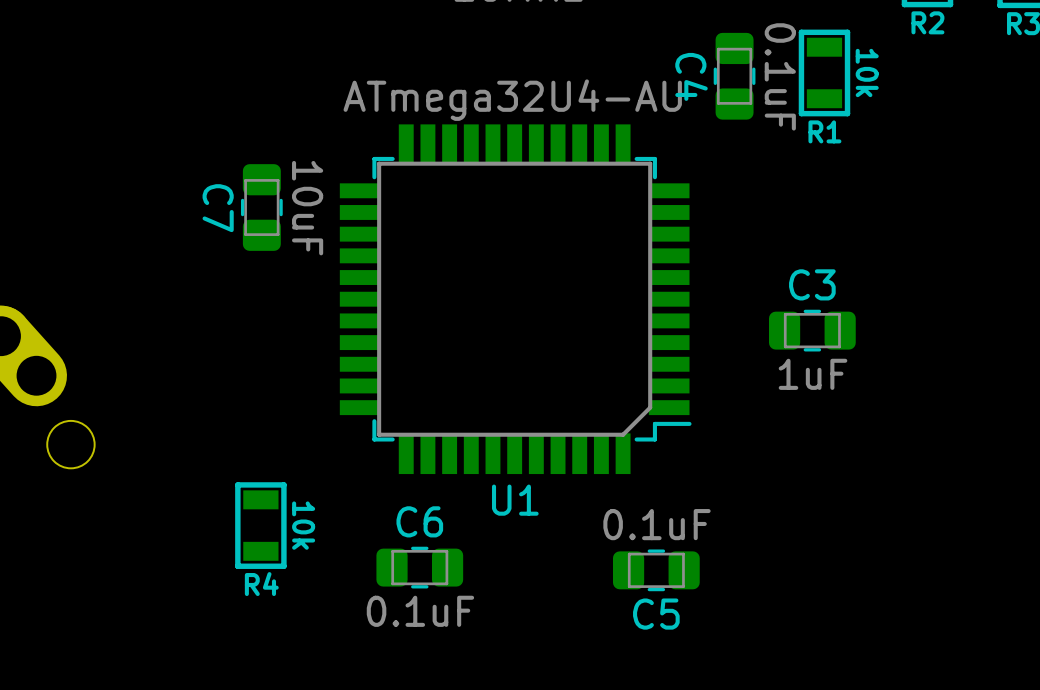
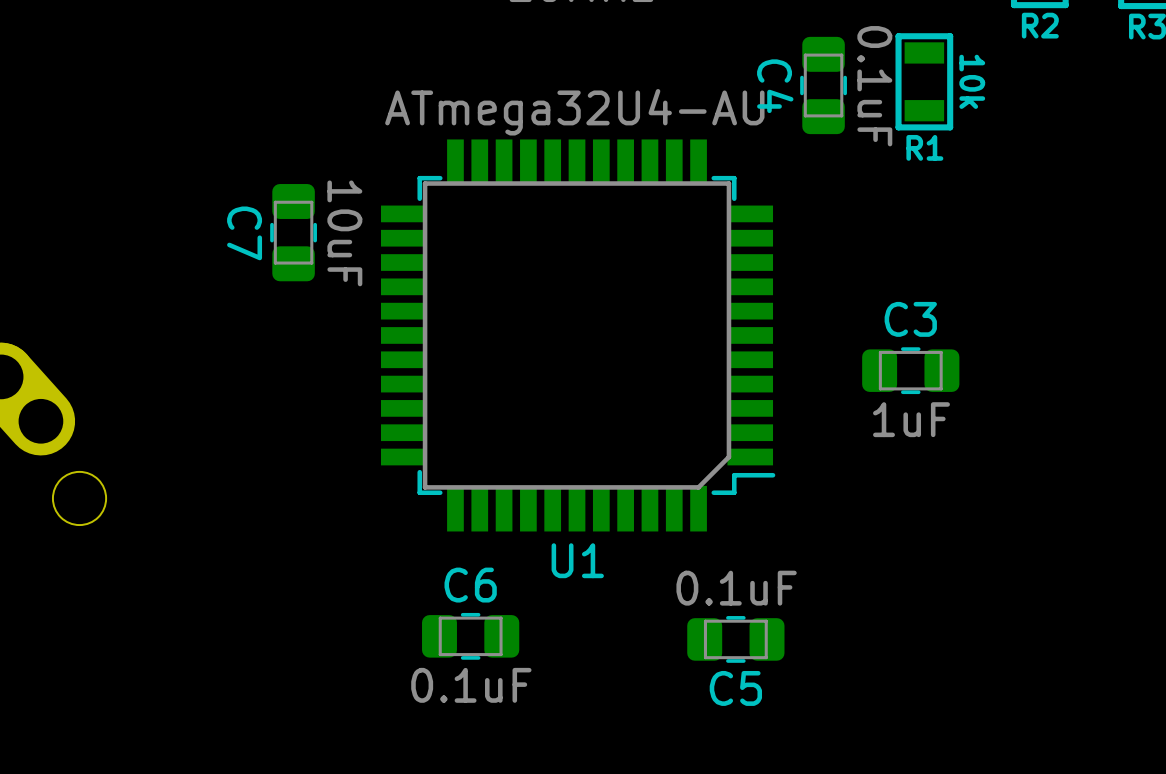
R4: 10k (260, 525) -> none

